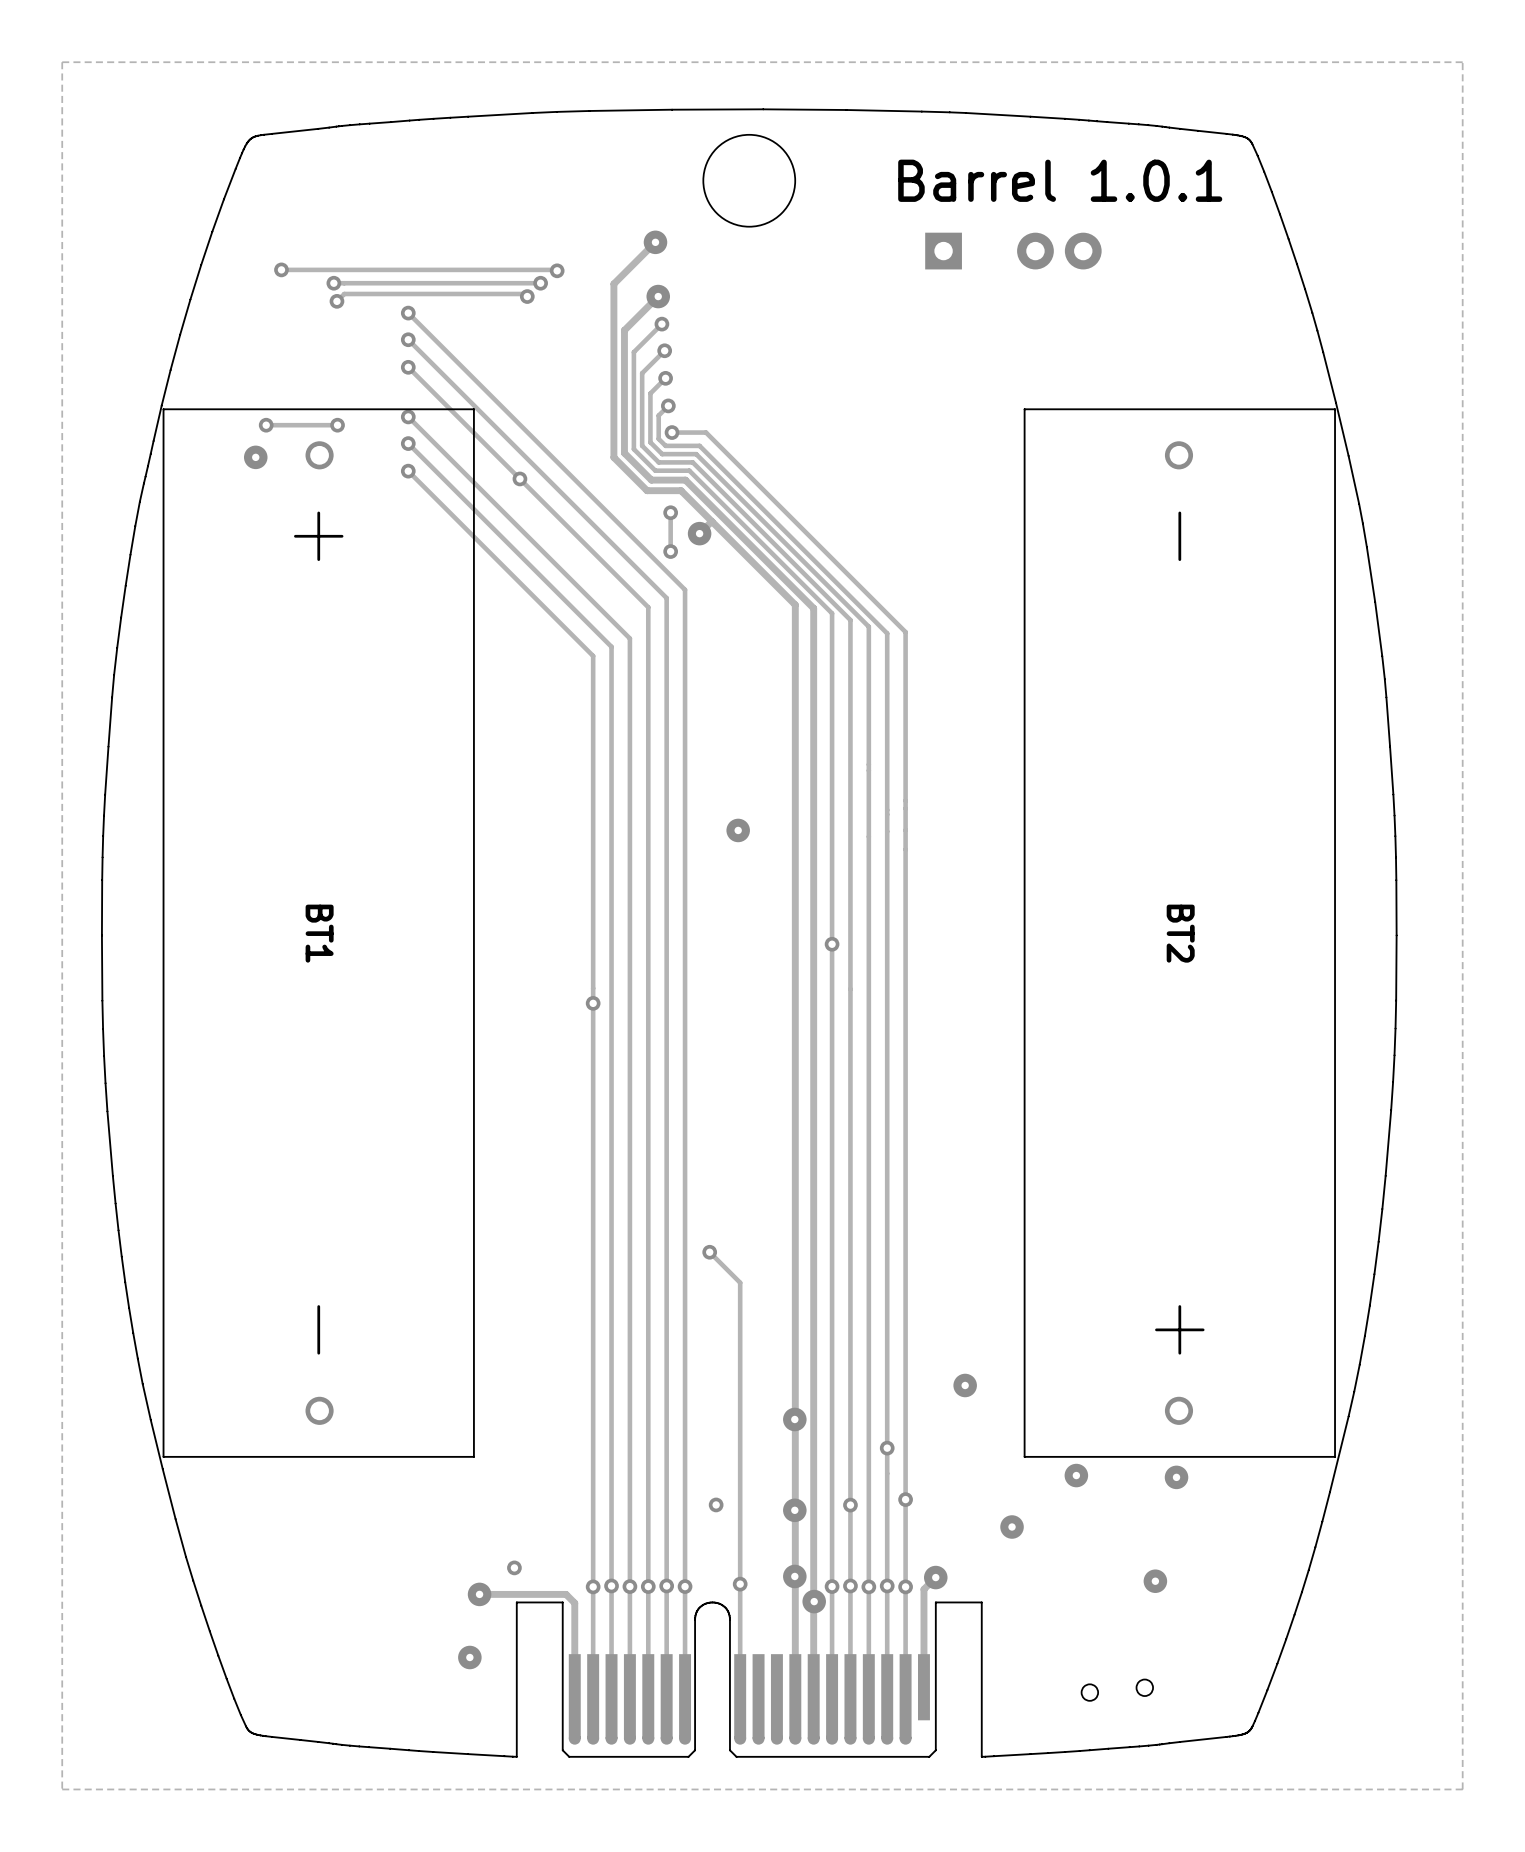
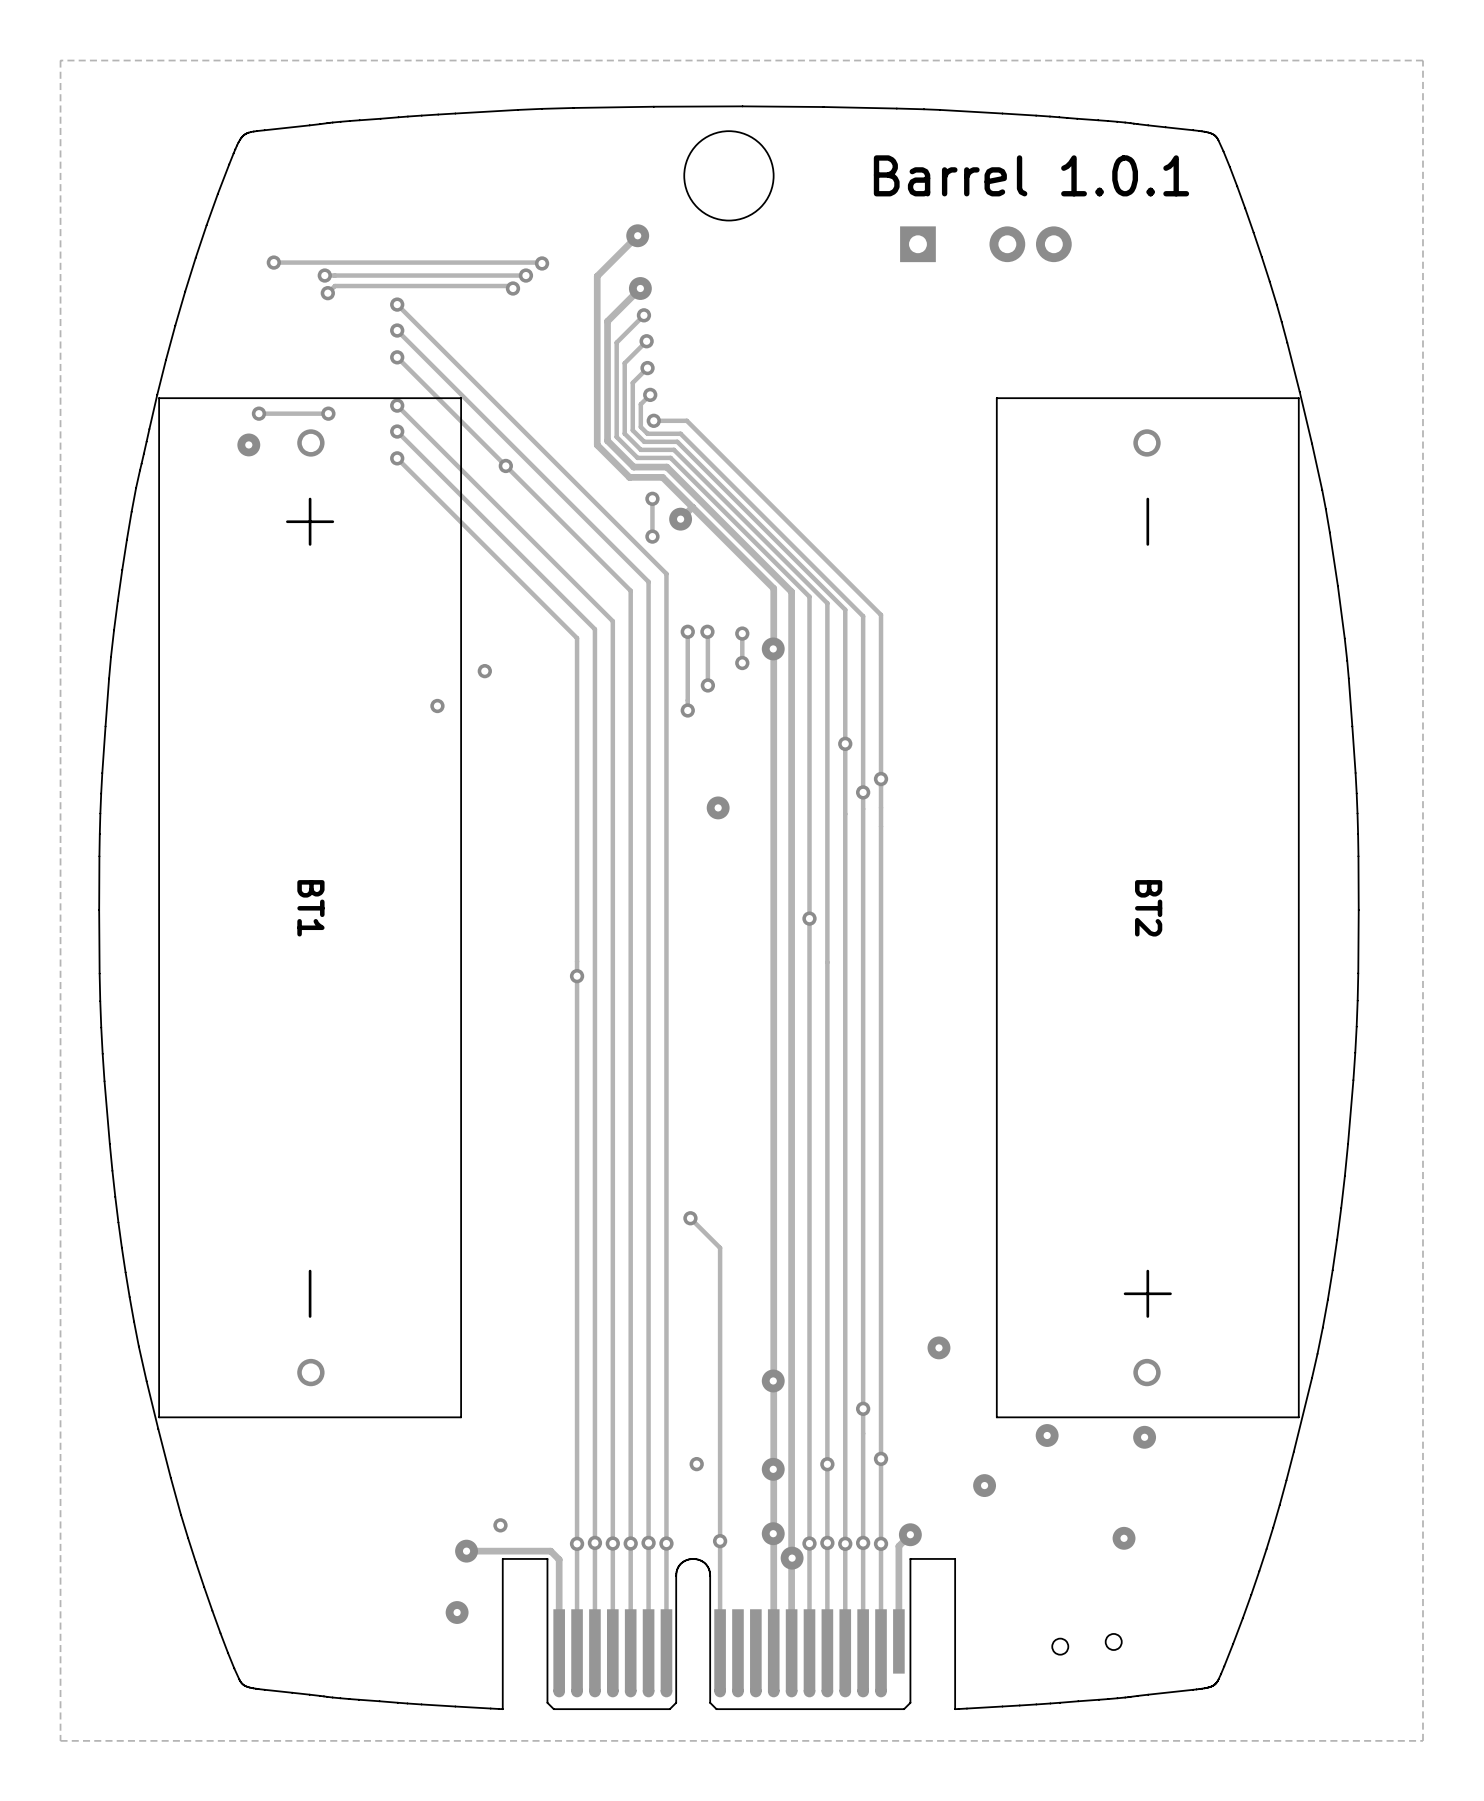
track: none -> (687, 631) (687, 710)
via: none -> (687, 631)
track: none -> (707, 631) (707, 685)
via: none -> (707, 631)
track: none -> (742, 633) (742, 663)
via: none -> (742, 633)
via: none -> (773, 648)
via: none -> (742, 663)
via: none -> (484, 671)
via: none -> (707, 685)
via: none -> (437, 706)
via: none -> (687, 710)
via: none -> (845, 743)
via: none -> (881, 779)
via: none -> (863, 792)

